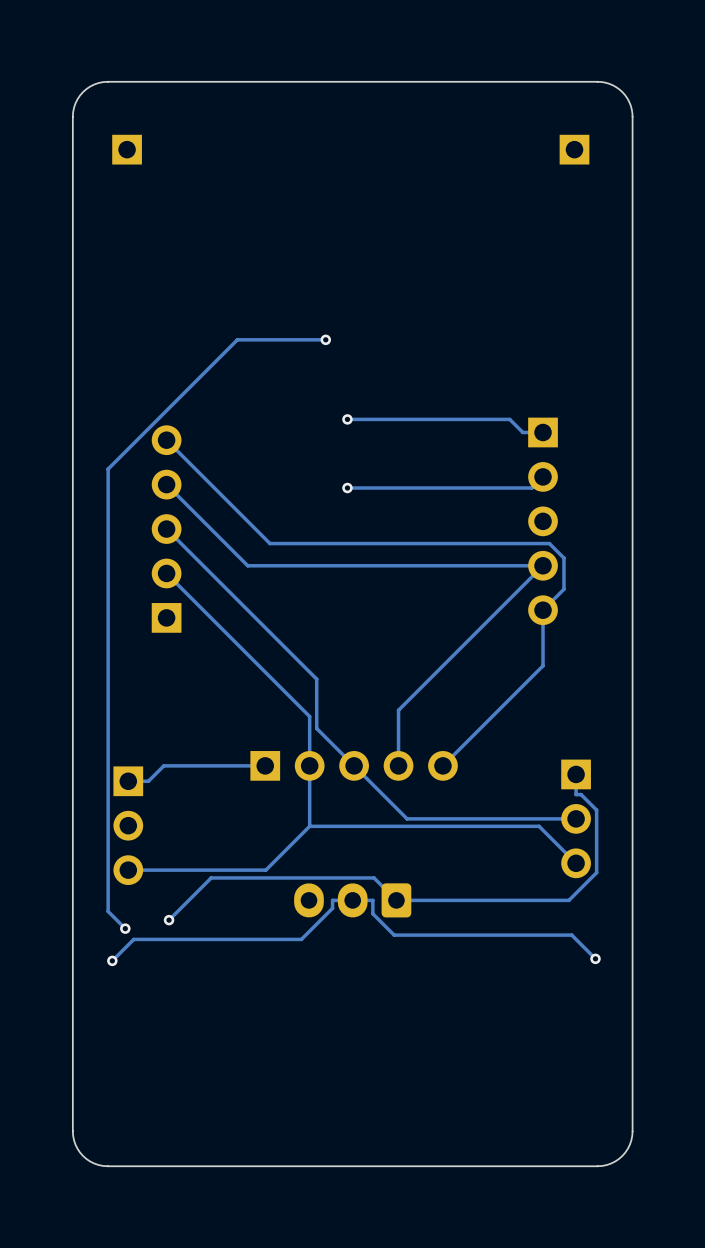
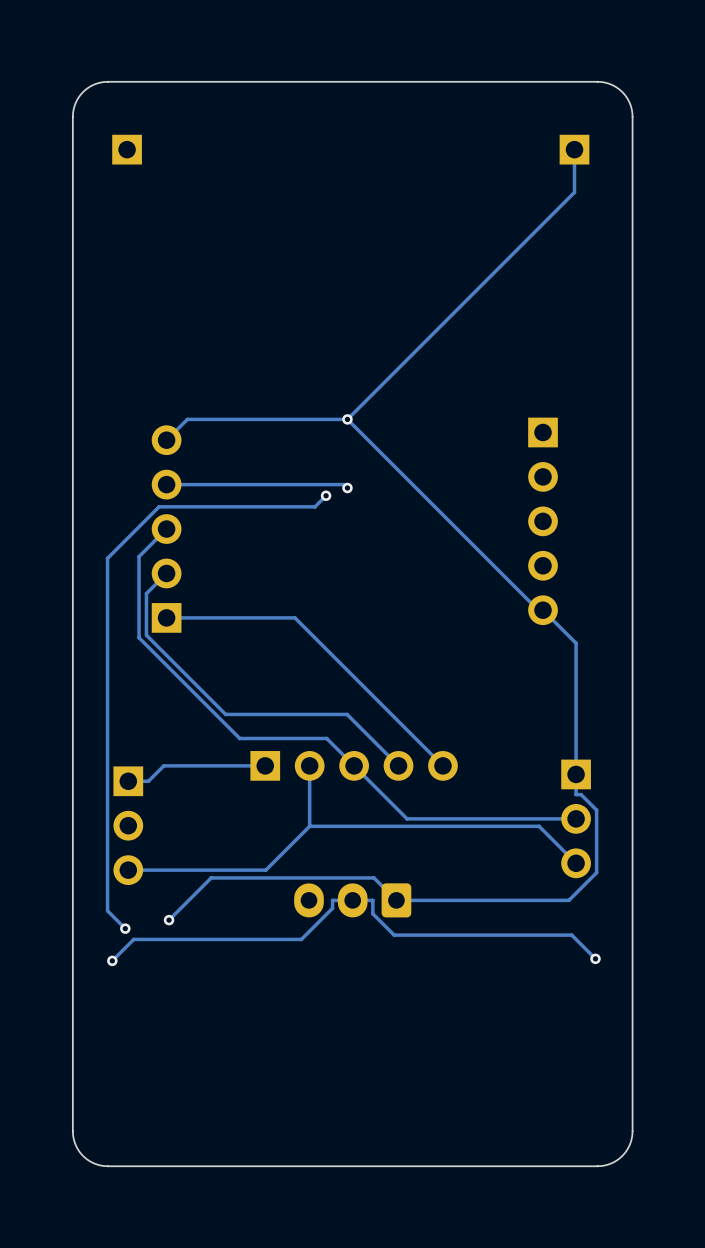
track: (325, 339) (237, 339) (108, 469) (108, 911) -> (326, 495) (315, 506) (159, 506) (107, 558) (108, 911)
via: (325, 339) -> none
track: (347, 419) (509, 419) (522, 432) (543, 432) -> (347, 419) (574, 192) (574, 149)
track: none -> (347, 419) (538, 610) (543, 610) (576, 643) (576, 774)
track: none -> (347, 419) (187, 419) (166, 440)
track: (166, 440) (269, 543) (549, 543) (563, 558) (563, 589) (543, 610) (543, 665) (442, 765) -> (166, 617) (294, 617) (442, 765)
track: (543, 476) (531, 488) (347, 488) -> (166, 484) (344, 484) (347, 488)
track: (166, 484) (247, 565) (543, 565) (398, 710) (398, 765) -> (166, 573) (146, 593) (146, 635) (225, 714) (347, 714) (398, 765)
via: none -> (326, 495)
track: (166, 529) (316, 679) (316, 728) (326, 738) -> (166, 529) (139, 556) (139, 637) (239, 738) (326, 738)
track: (166, 573) (309, 716) (309, 765) -> none

